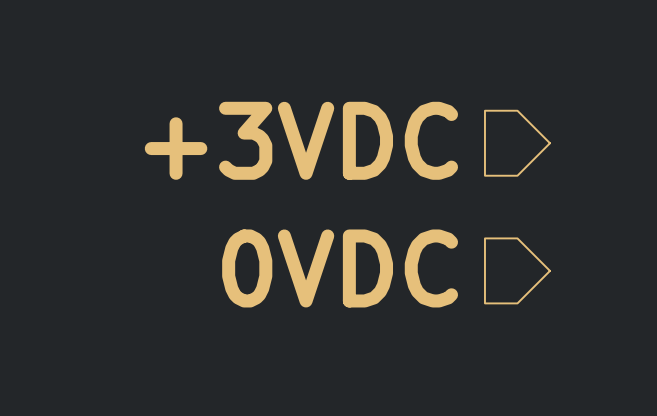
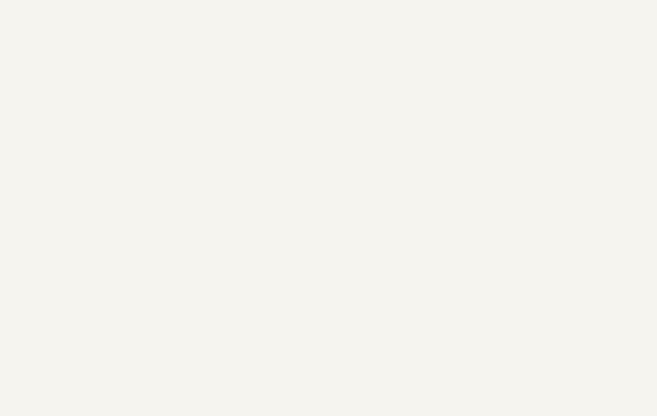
hierarchical label: +3VDC (301, 140) -> none
hierarchical label: 0VDC (340, 268) -> none

